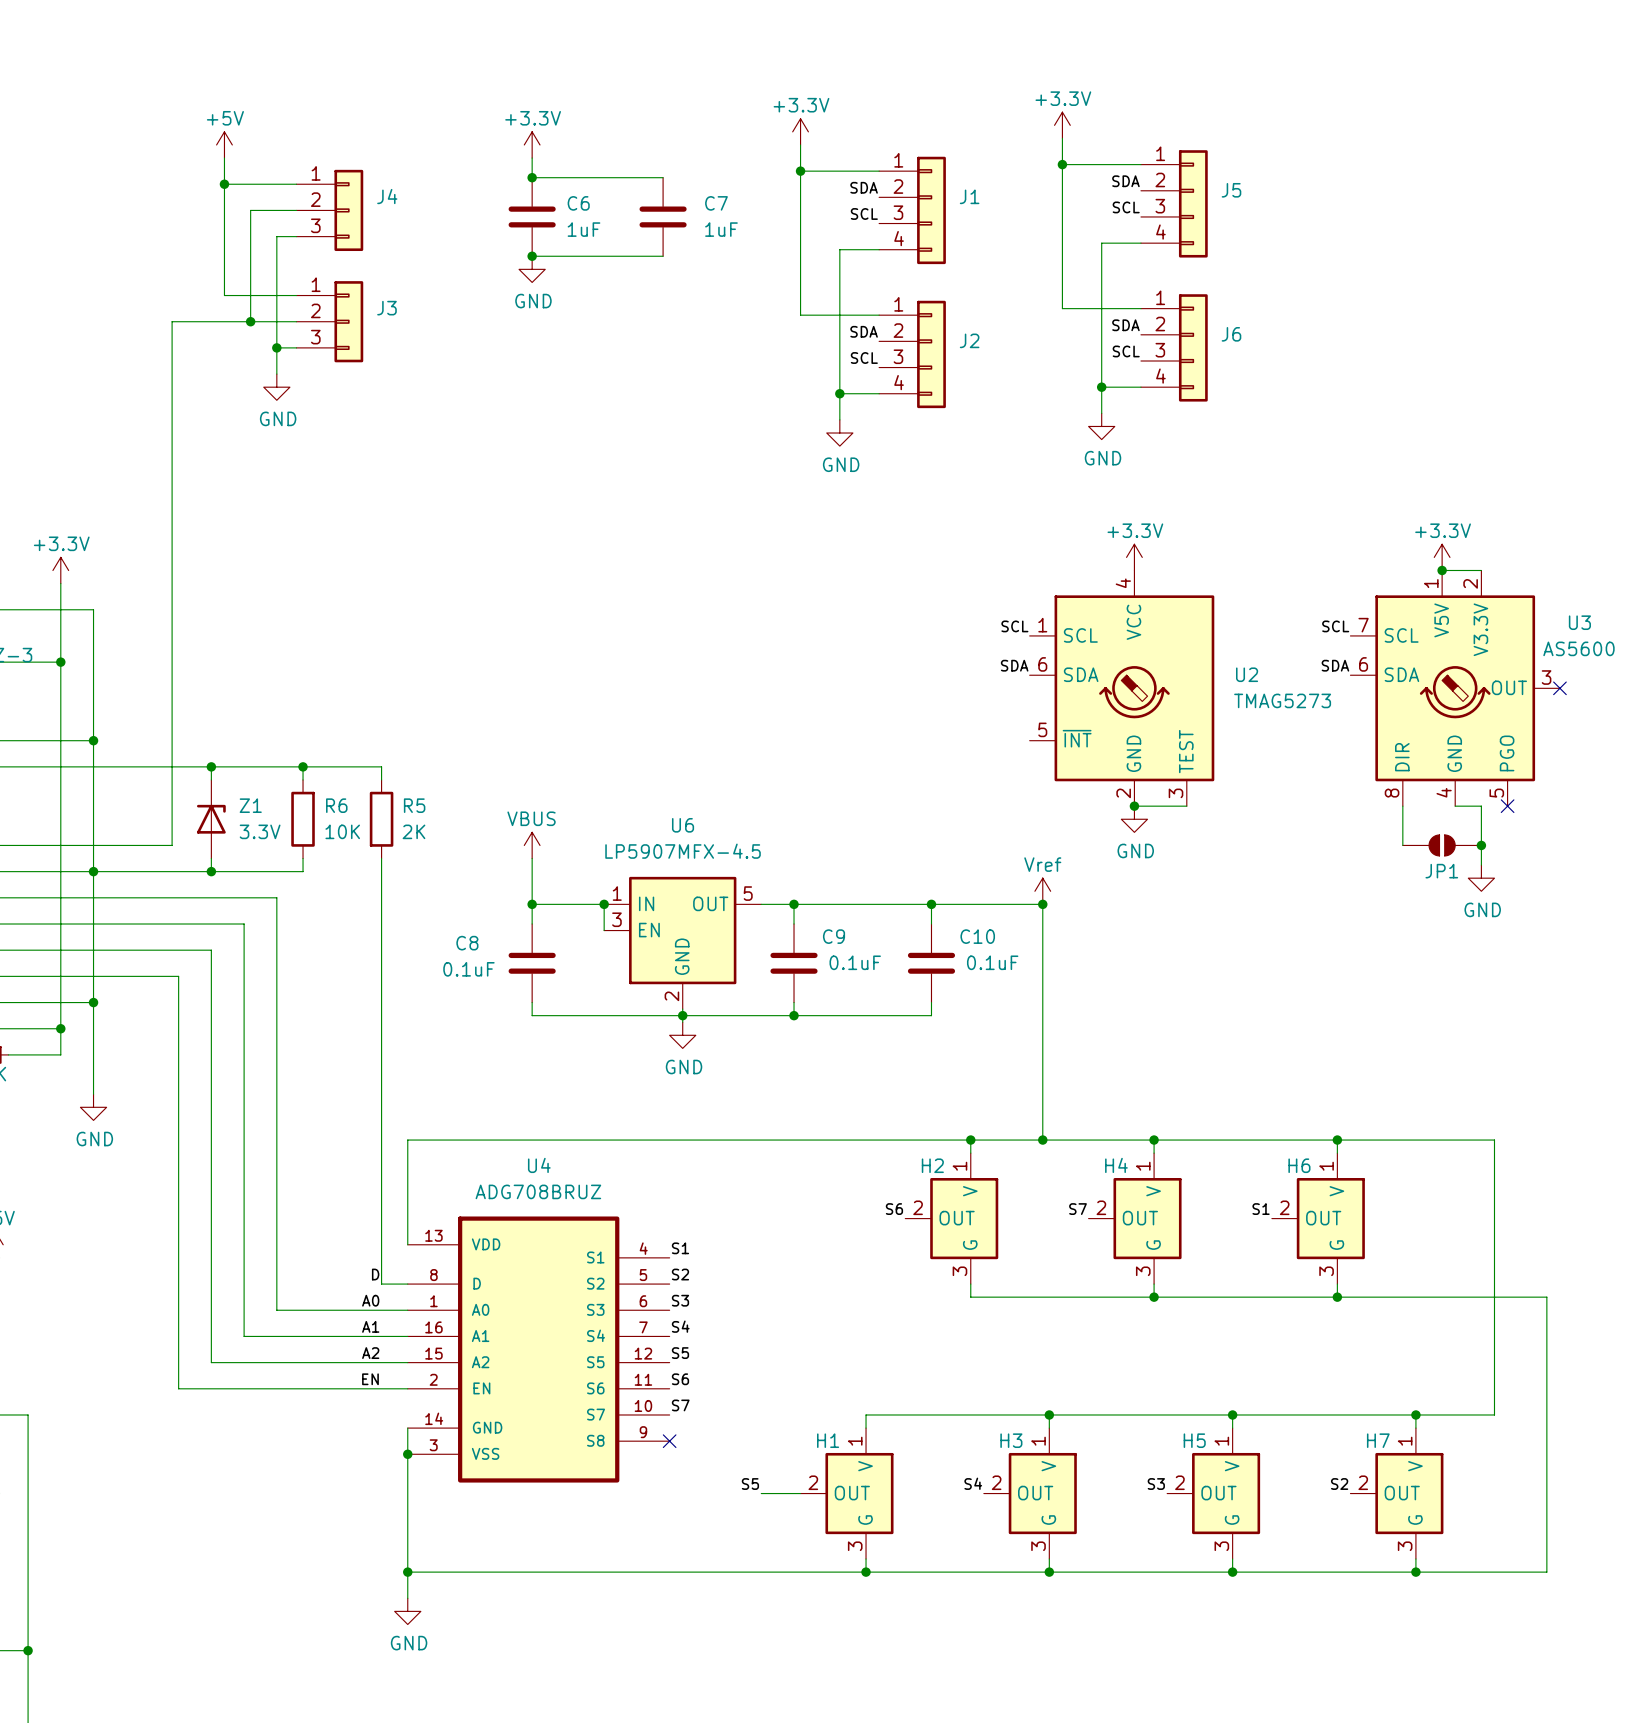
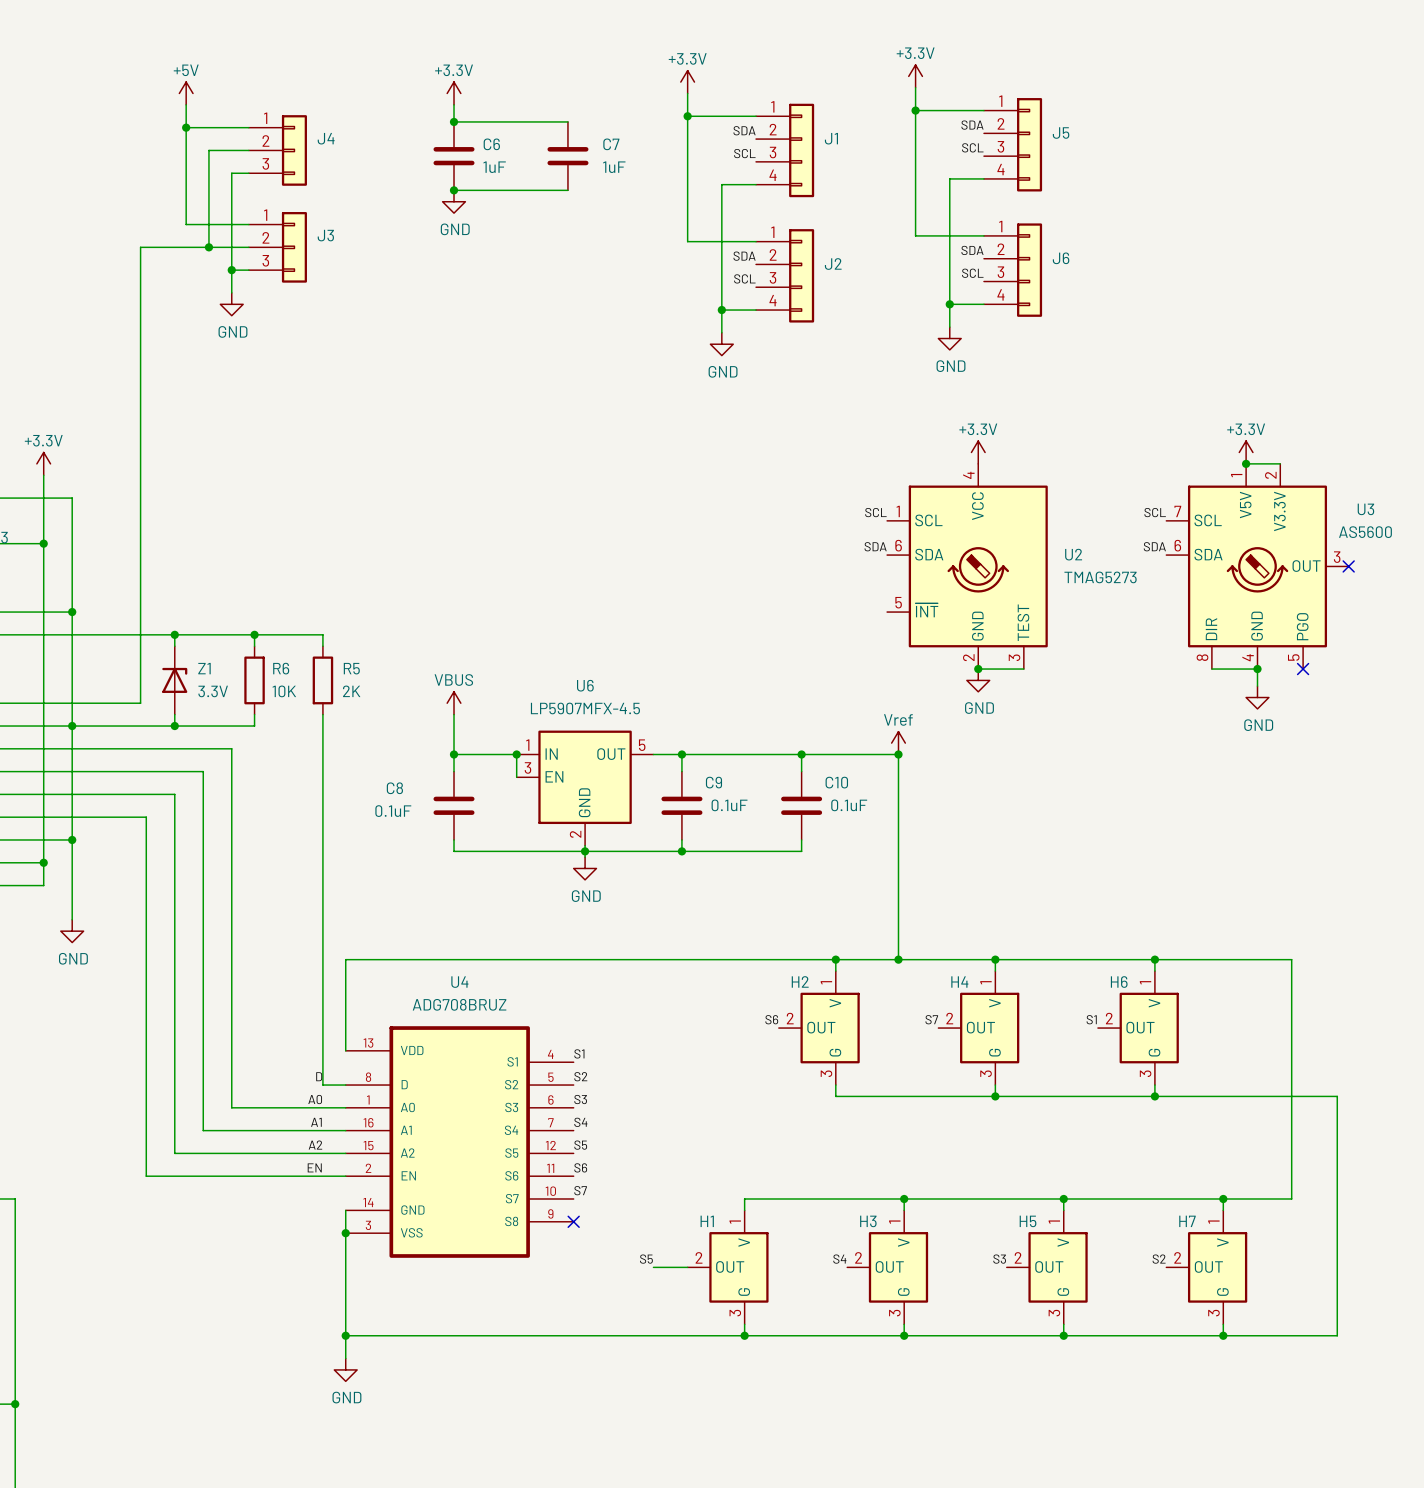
wire: (1402, 806) (1402, 845) -> (1211, 669) (1257, 669) (1257, 686)
wire: (1455, 806) (1481, 806) (1481, 865) -> none
JP1: (1442, 845) -> none
junction position: (1481, 845) -> (1257, 669)
power symbol position: GND (1481, 878) -> GND (1257, 697)

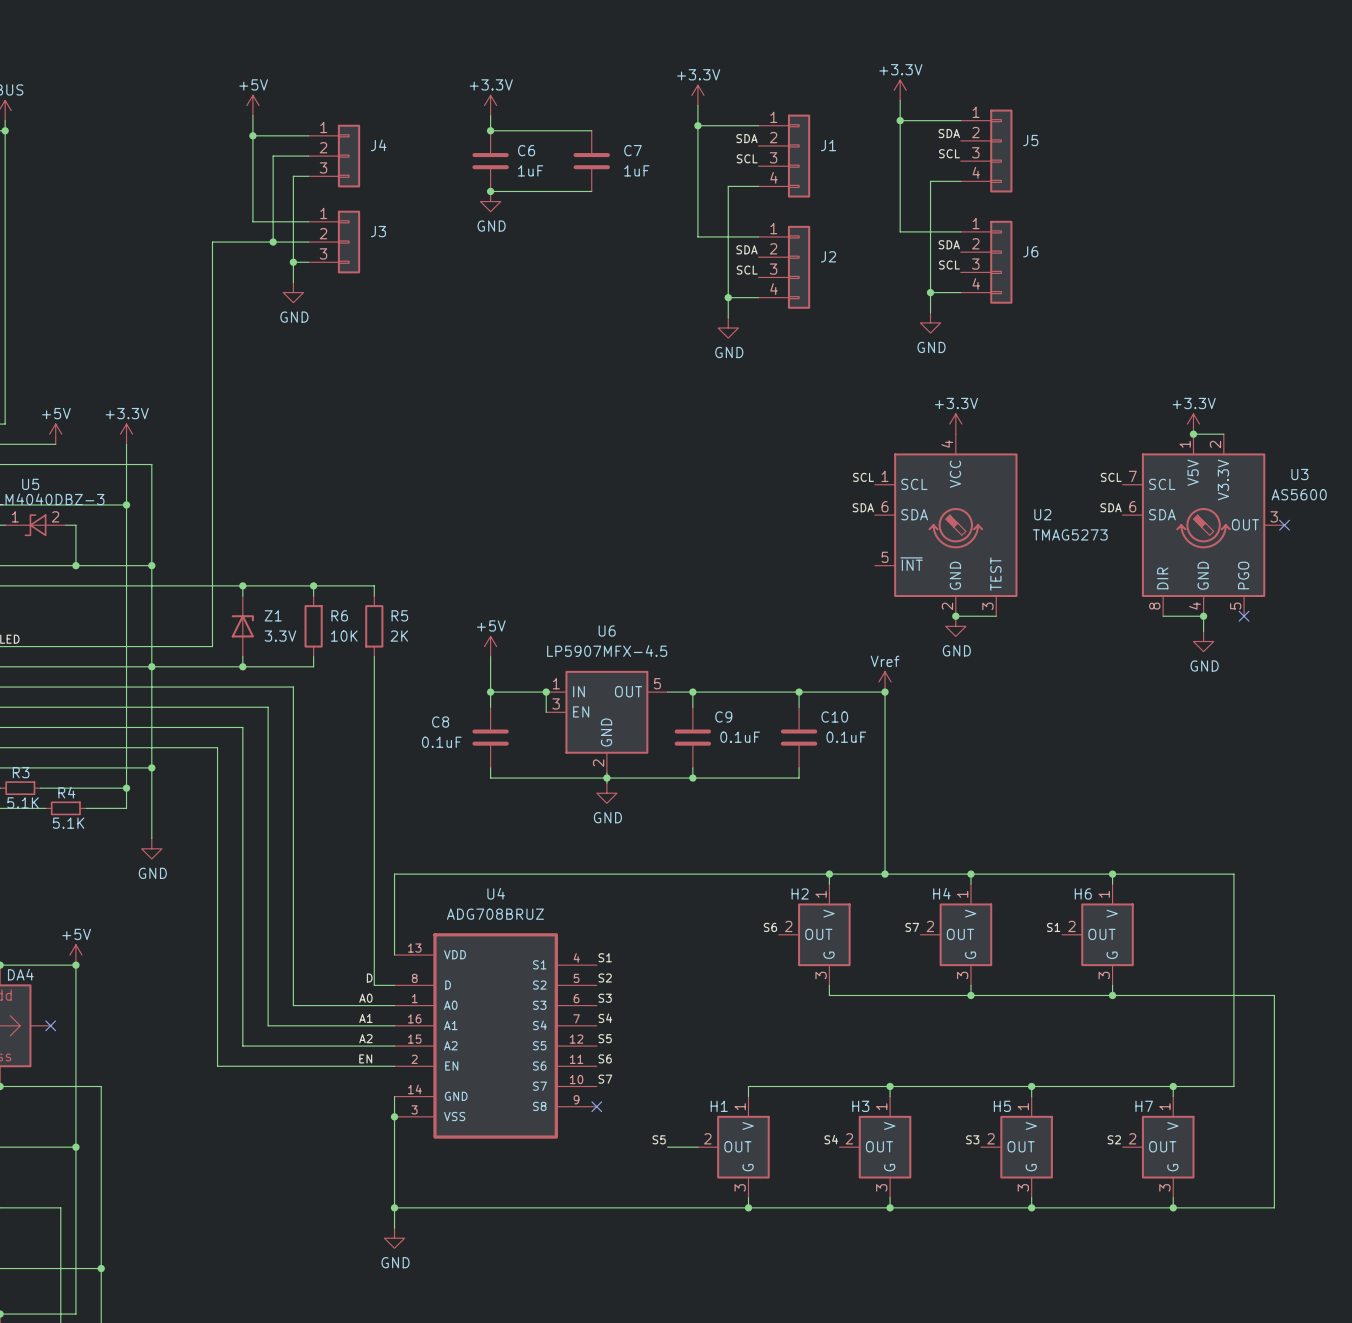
power symbol: VBUS (454, 703) -> +5V (490, 646)

